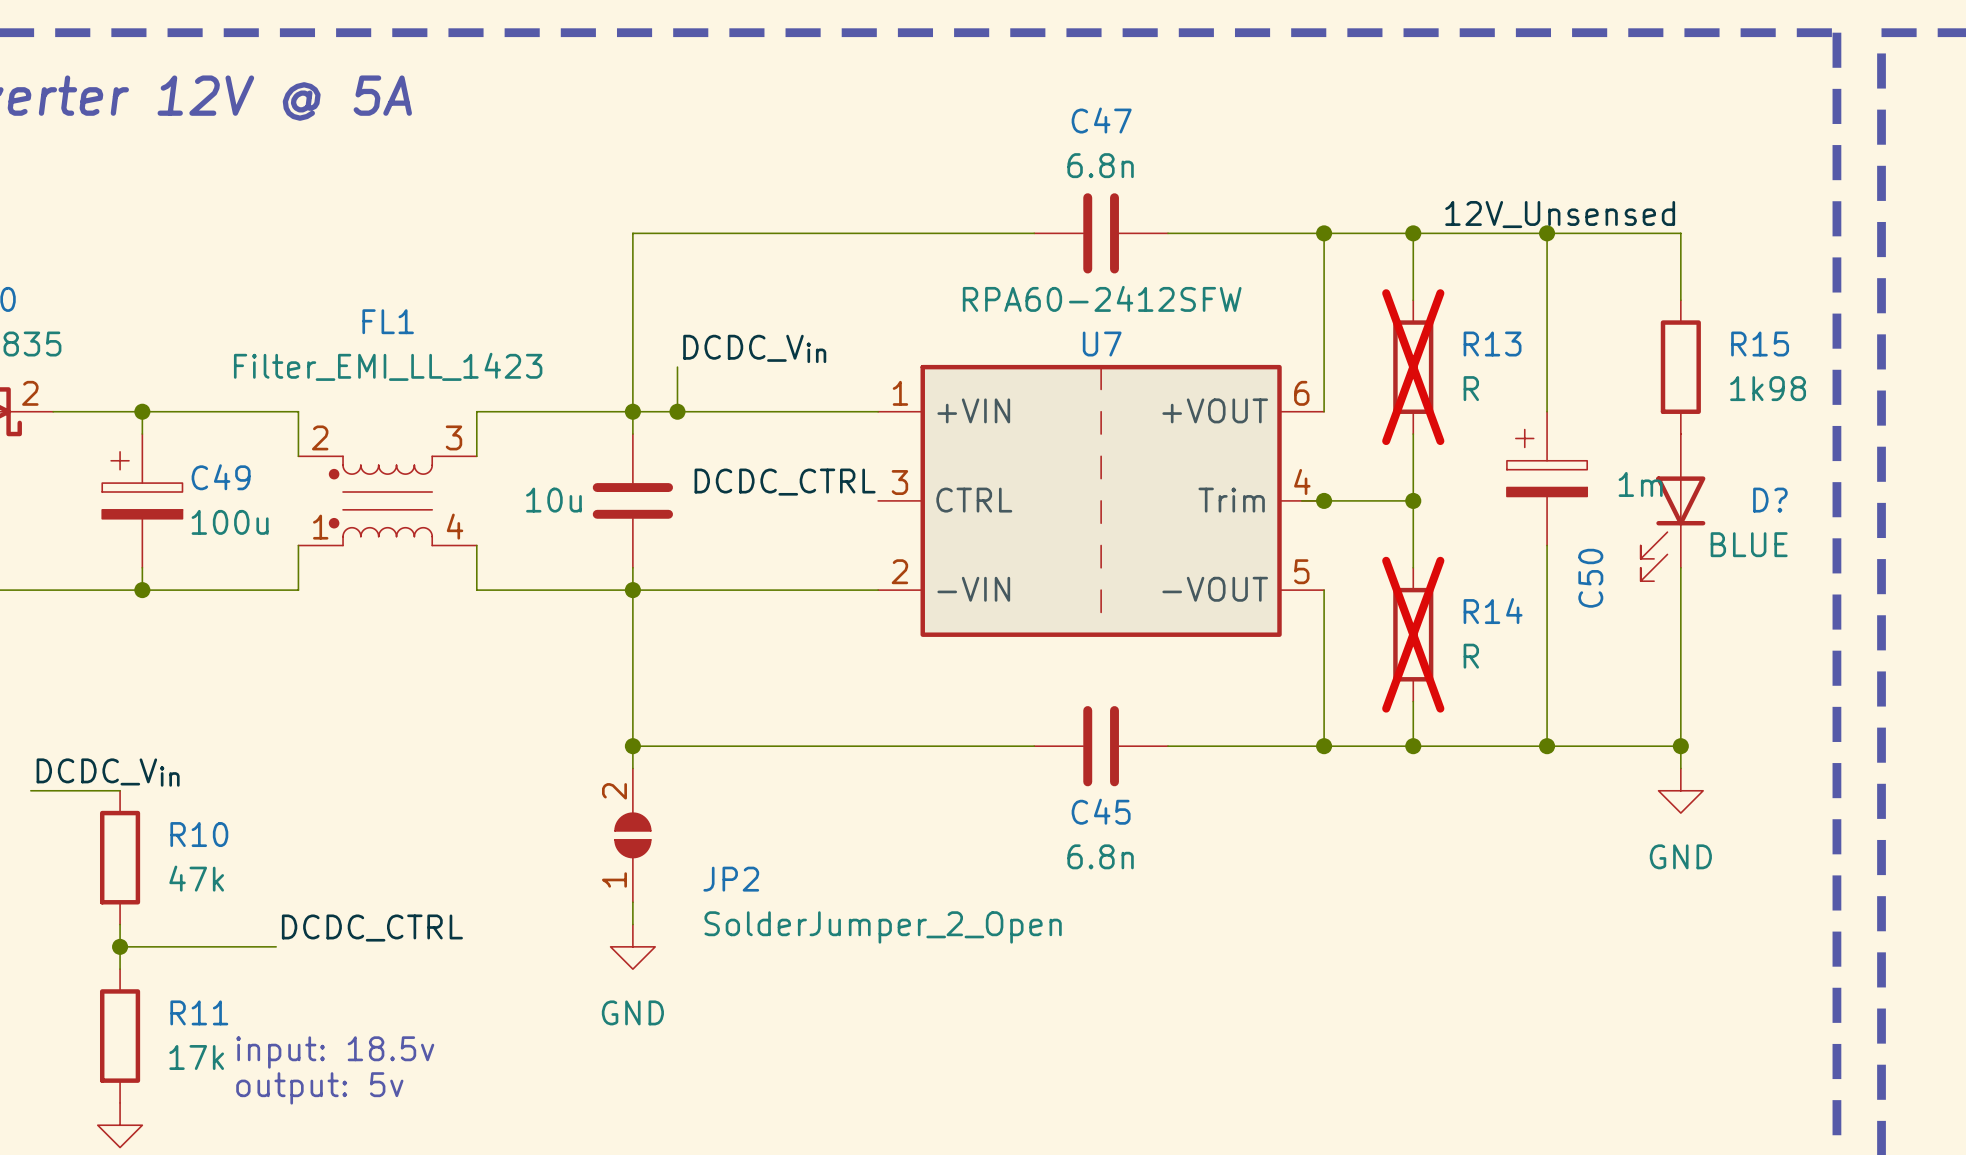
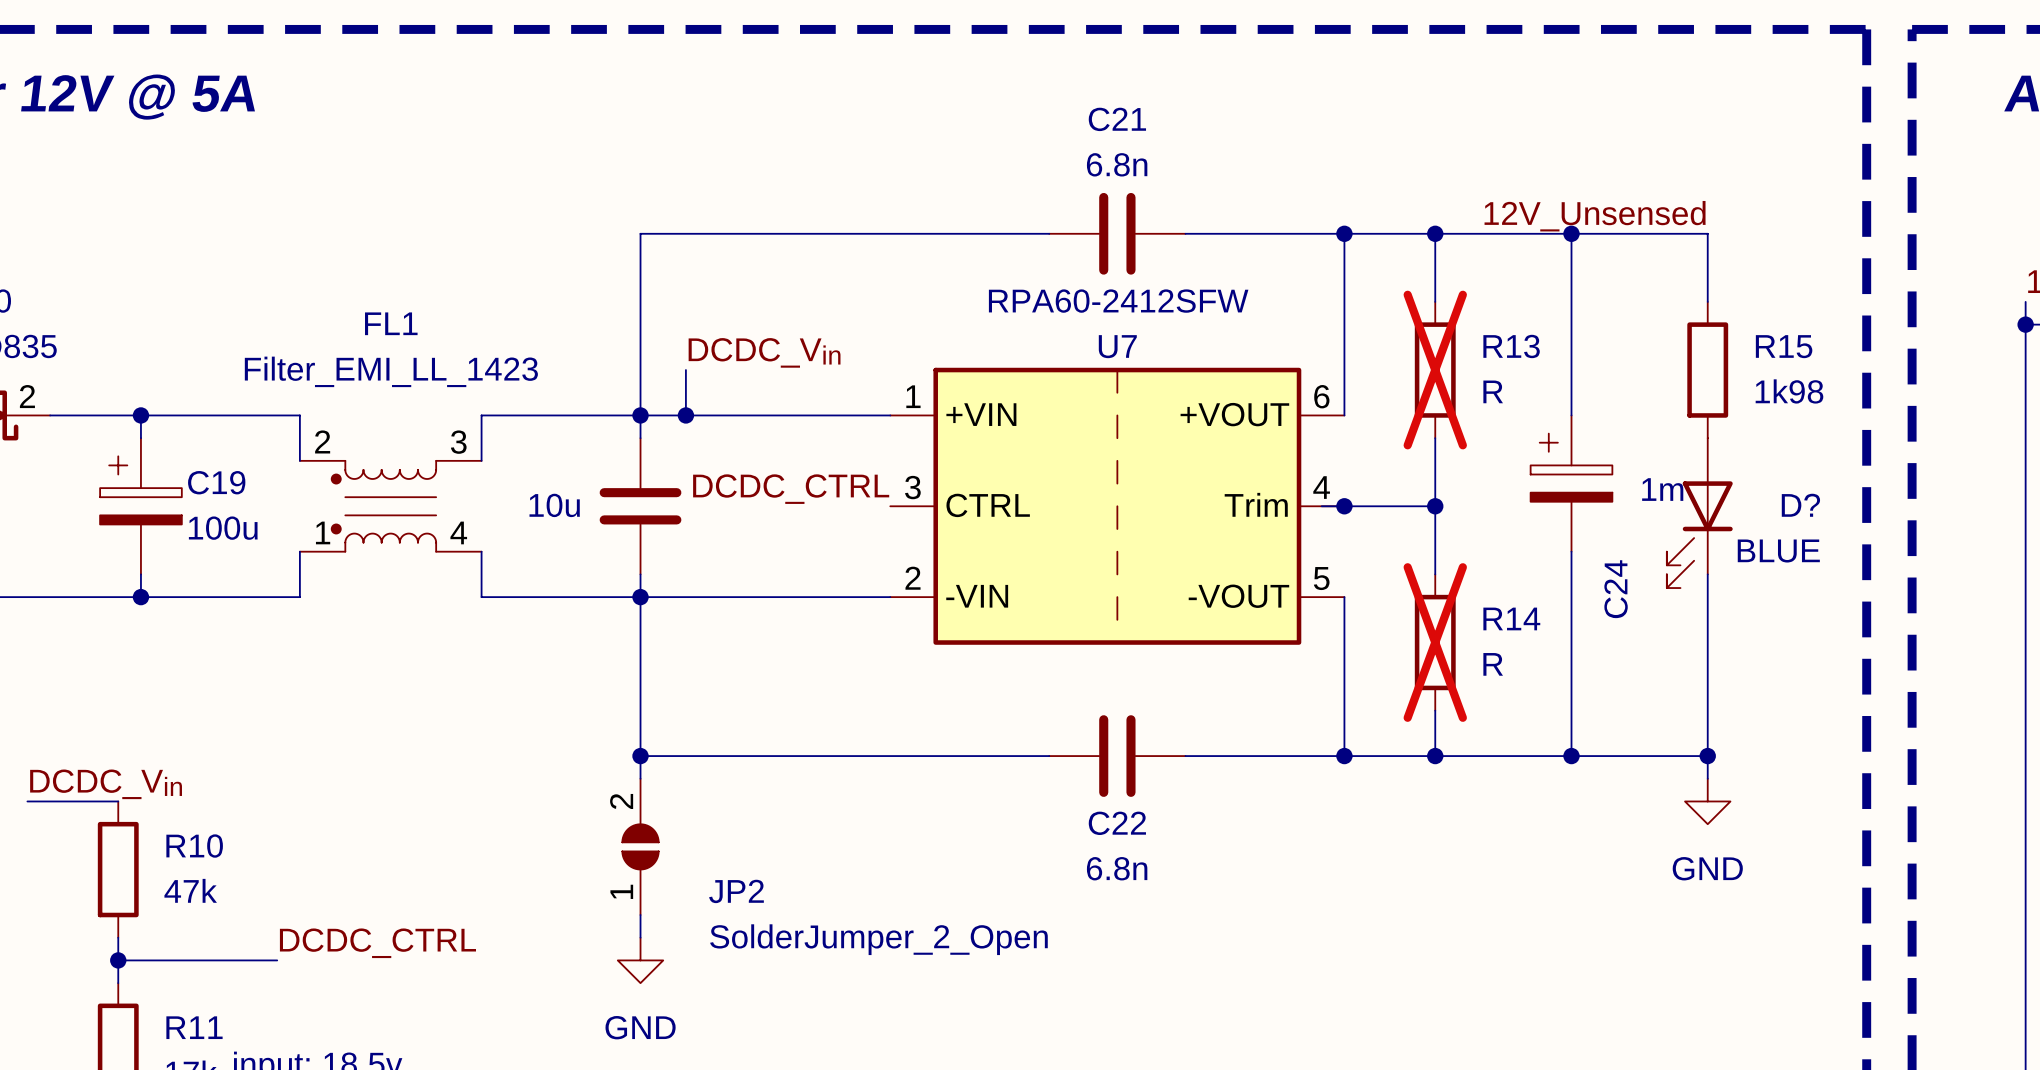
C47 name: C47 (1101, 120) -> C21 (1117, 119)
C49 name: C49 (221, 477) -> C19 (216, 482)
C50 name: C50 (1590, 578) -> C24 (1616, 589)
C45 name: C45 (1101, 811) -> C22 (1117, 823)

